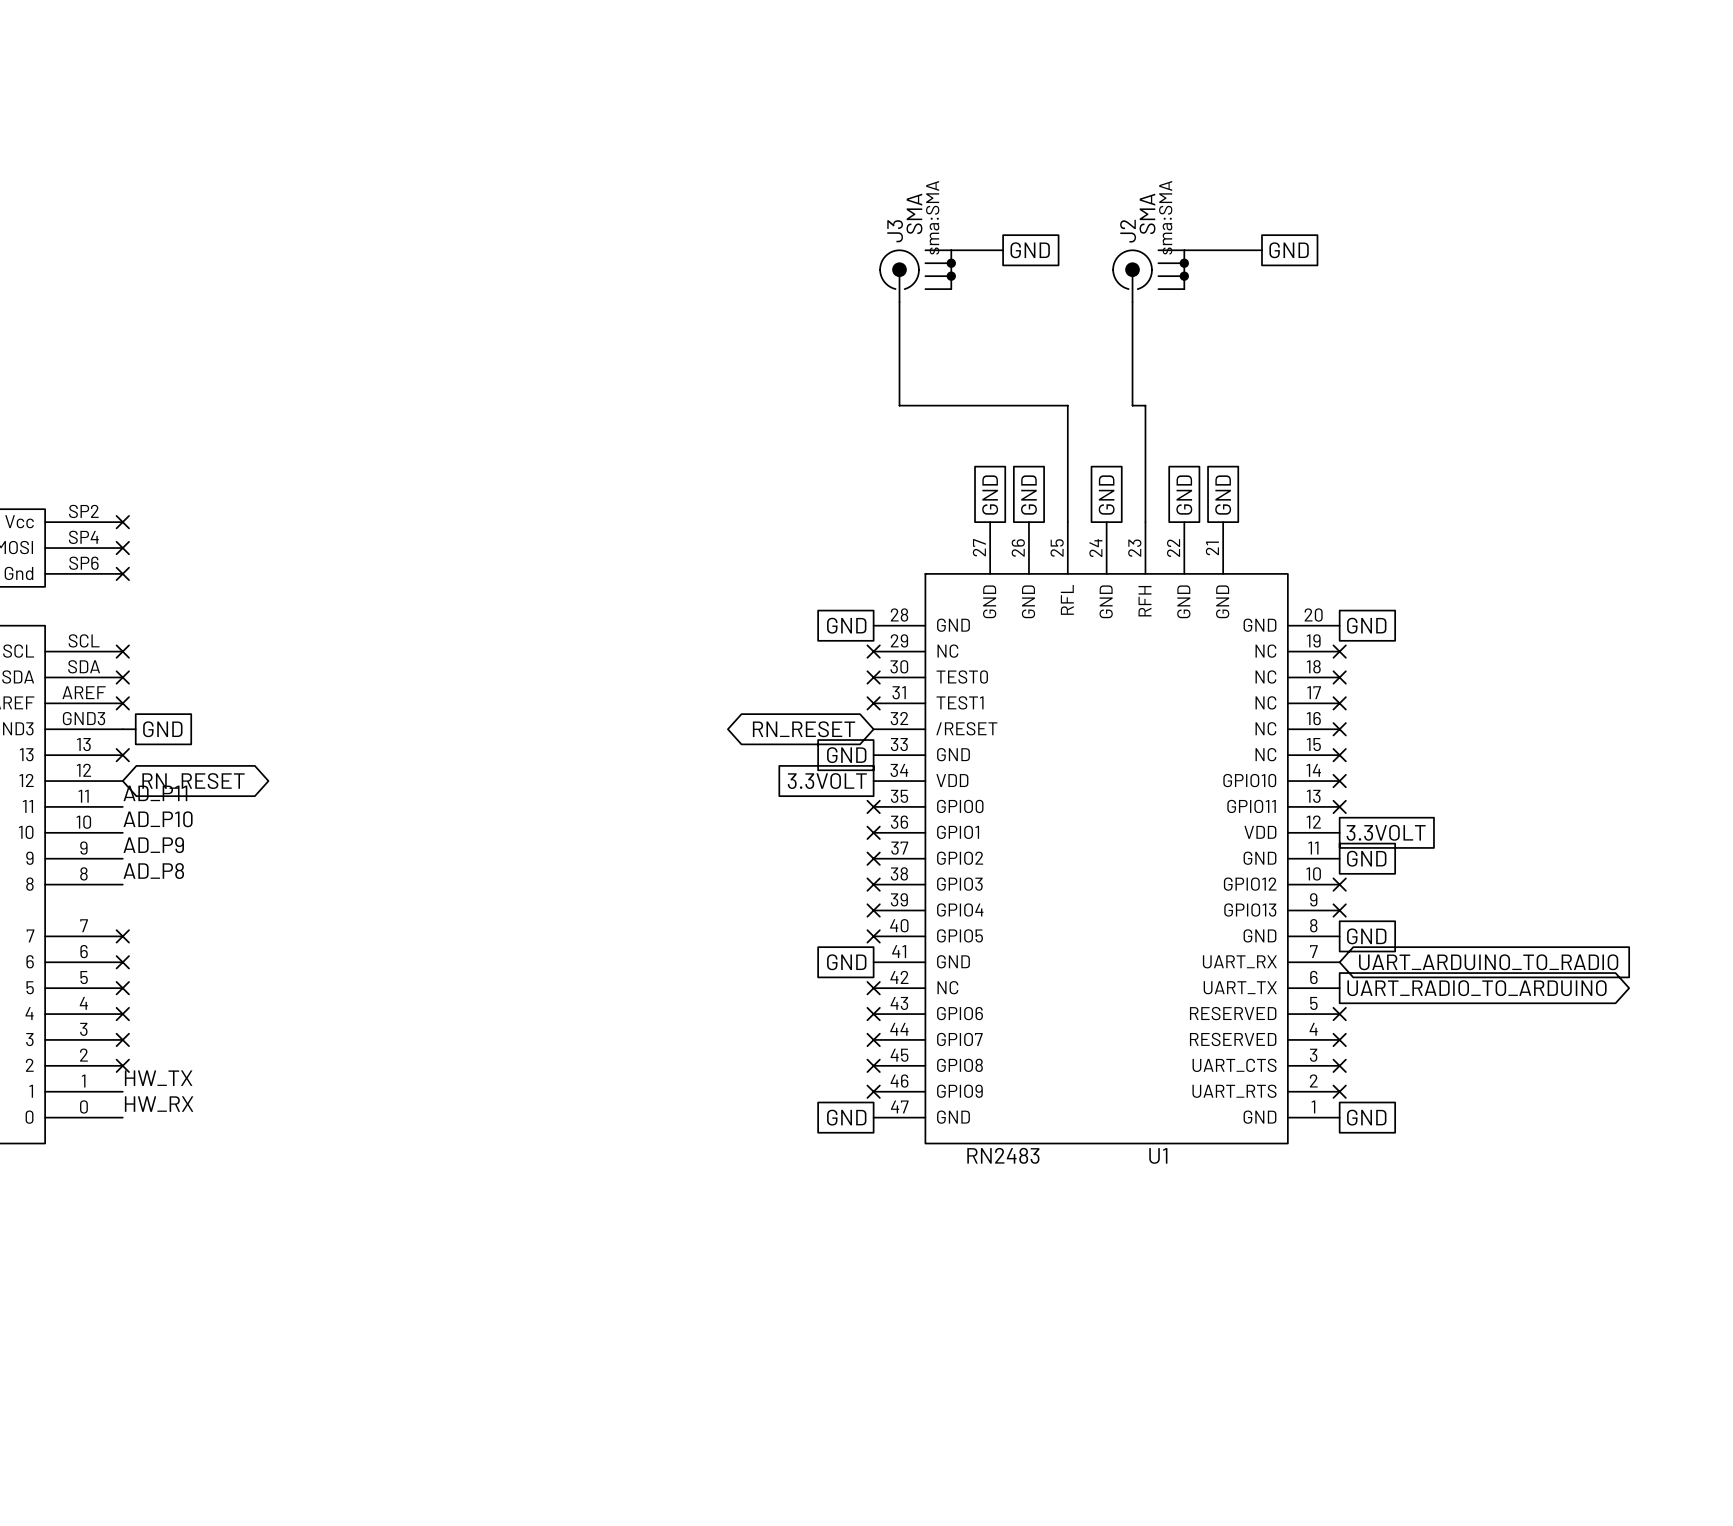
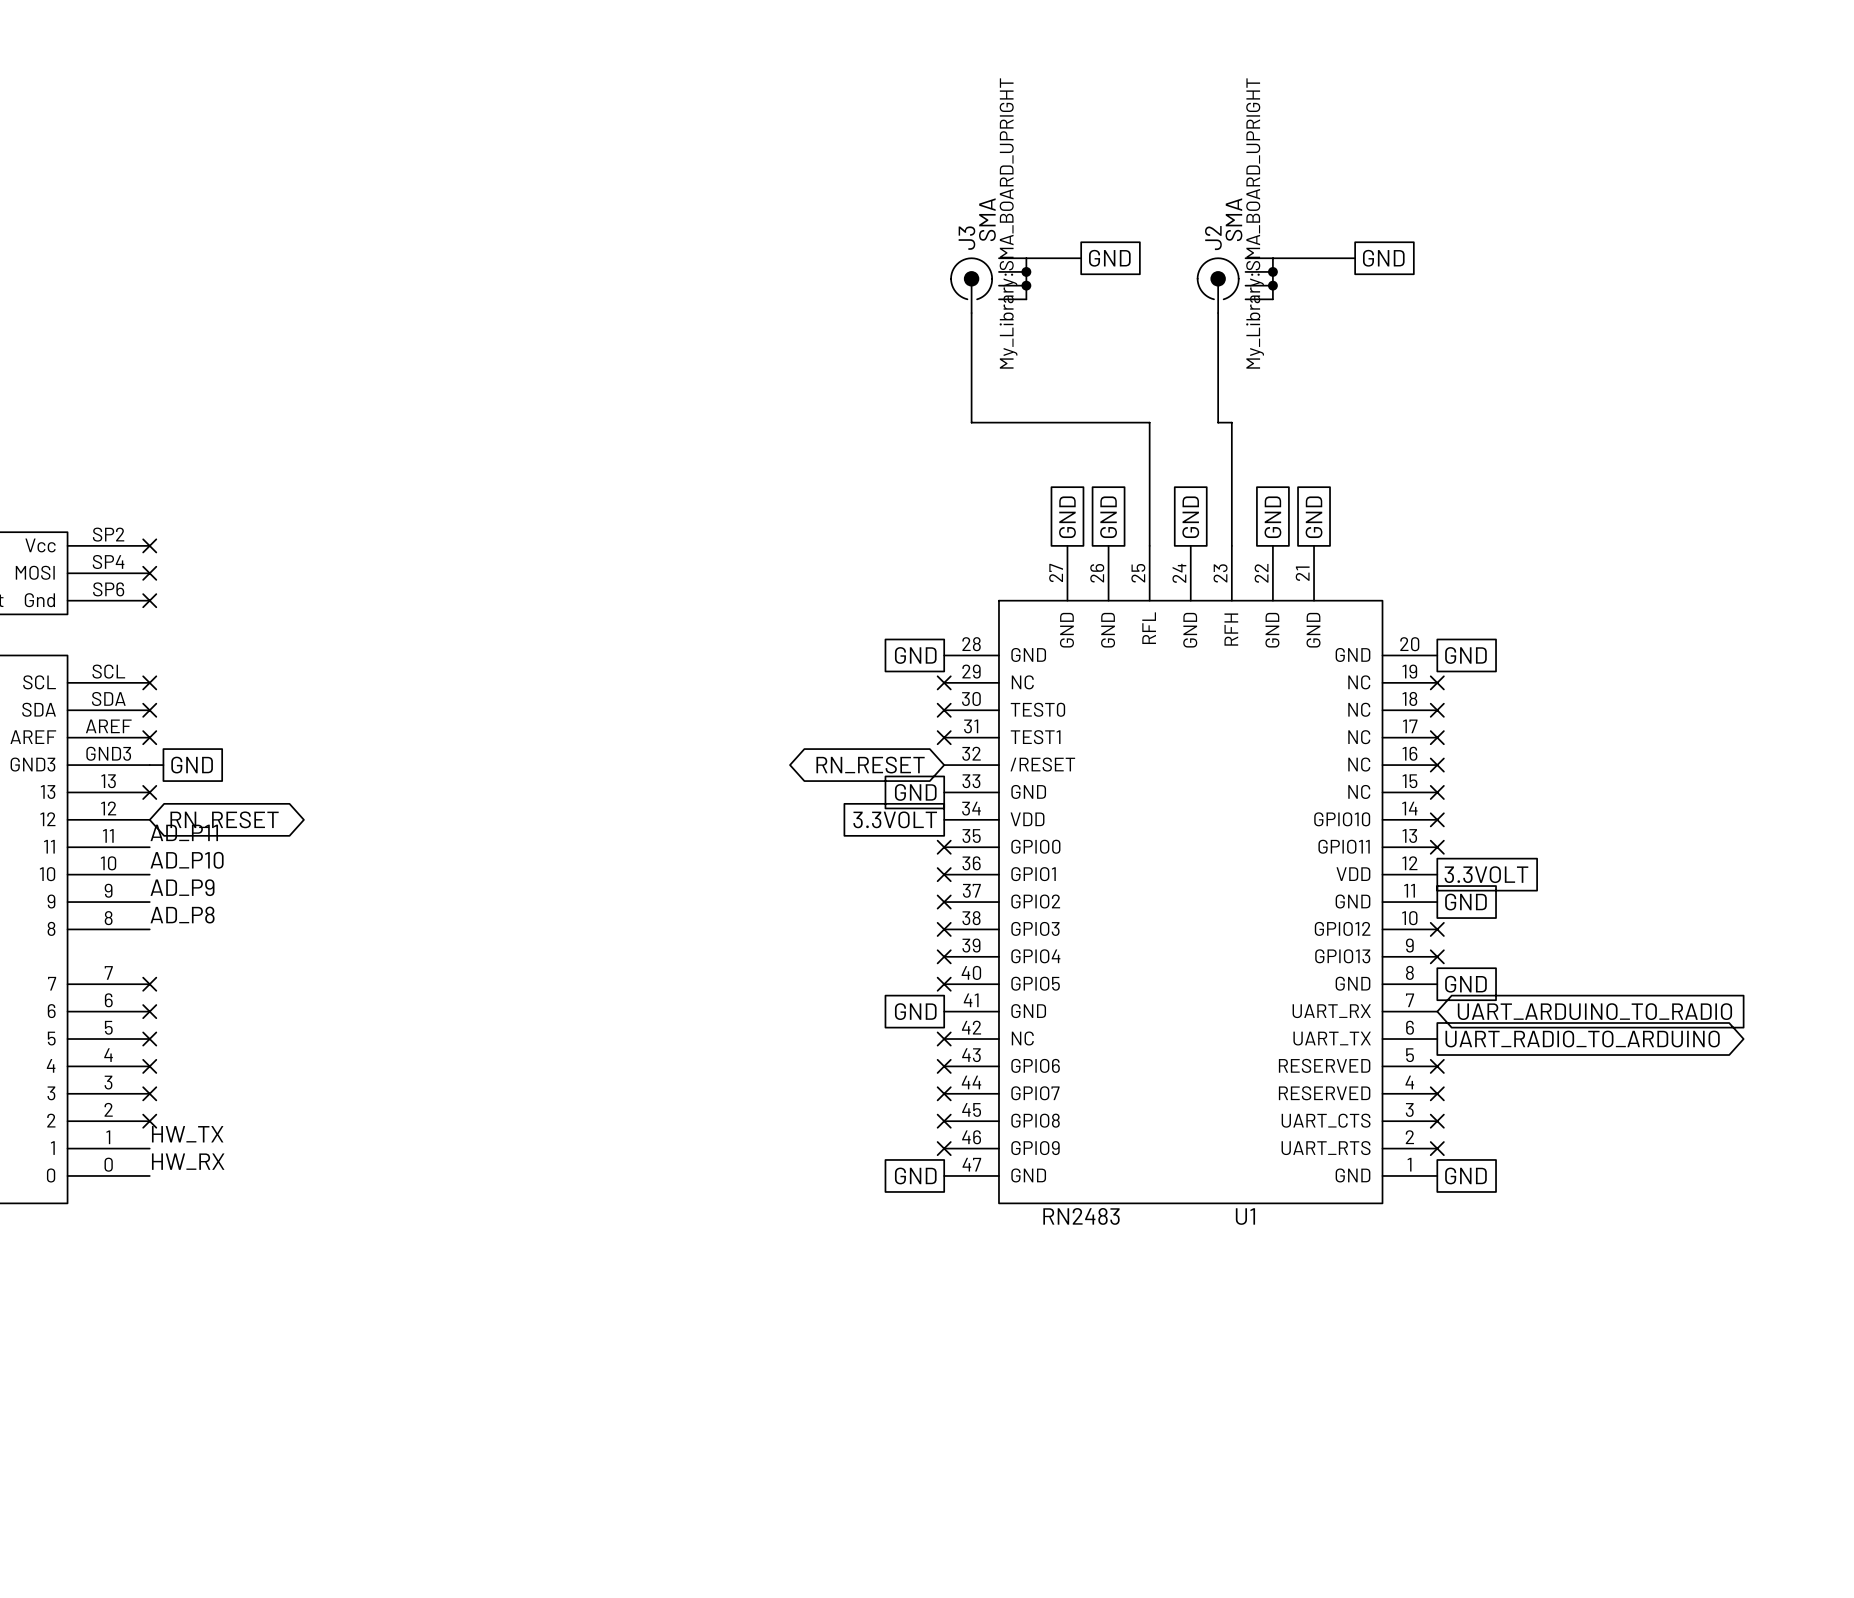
J3 text: sma:SMA (932, 217) -> My_Library:SMA_BOARD_UPRIGHT (1008, 223)
J2 text: sma:SMA (1165, 217) -> My_Library:SMA_BOARD_UPRIGHT (1255, 223)

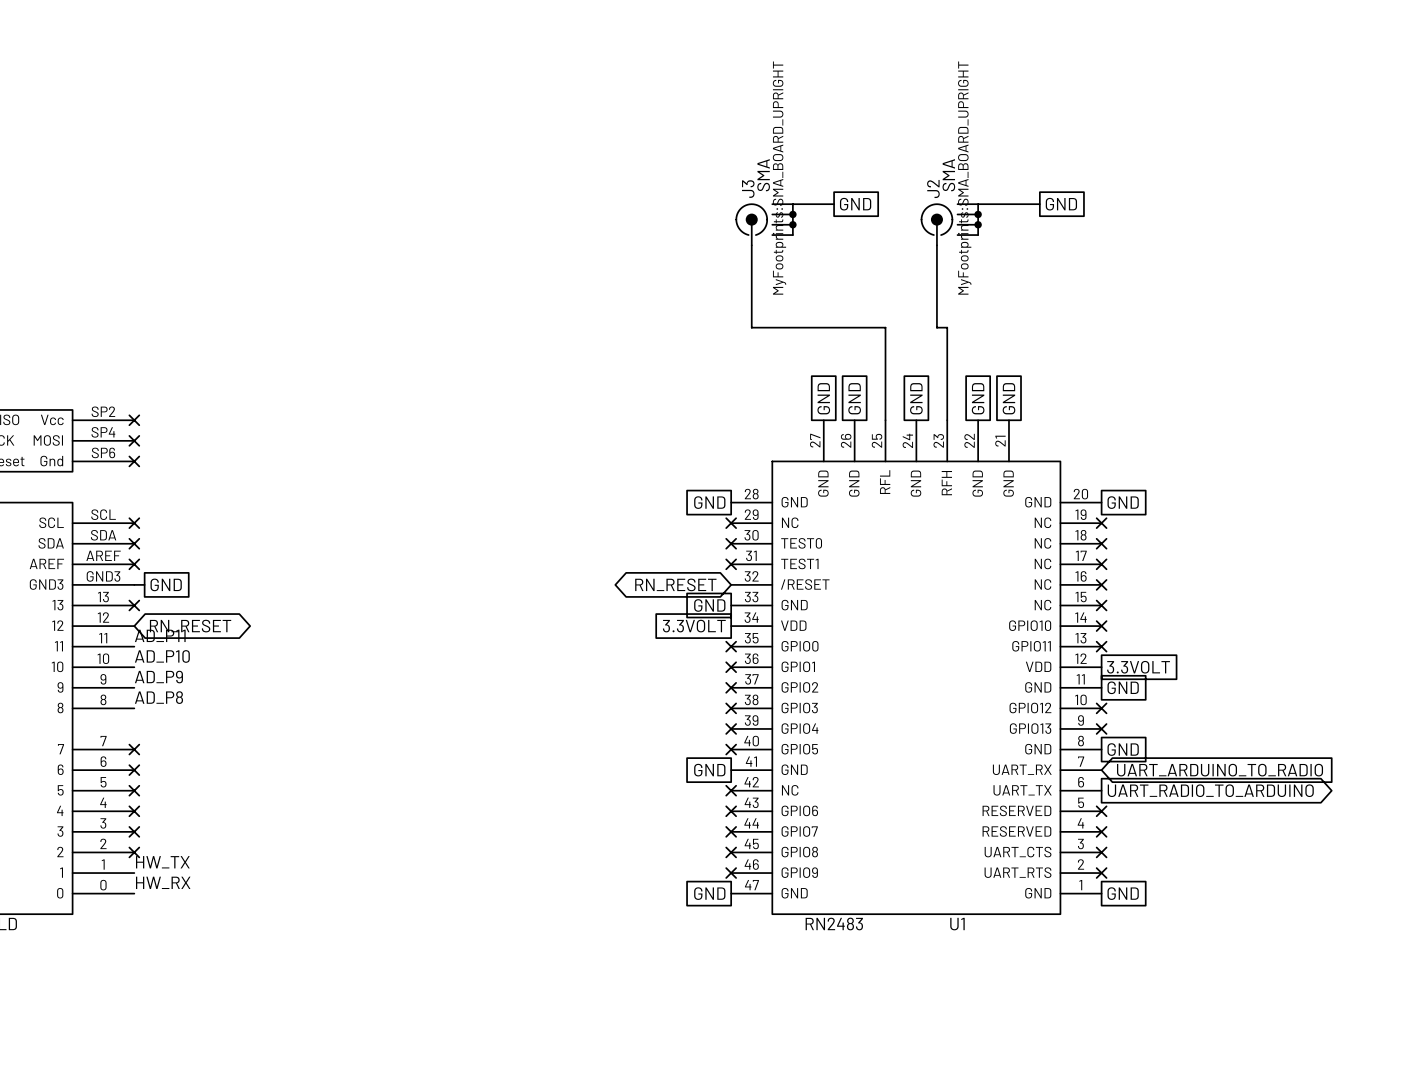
J3 text: My_Library:SMA_BOARD_UPRIGHT (1008, 223) -> MyFootprints:SMA_BOARD_UPRIGHT (779, 178)
J2 text: My_Library:SMA_BOARD_UPRIGHT (1255, 223) -> MyFootprints:SMA_BOARD_UPRIGHT (964, 178)

